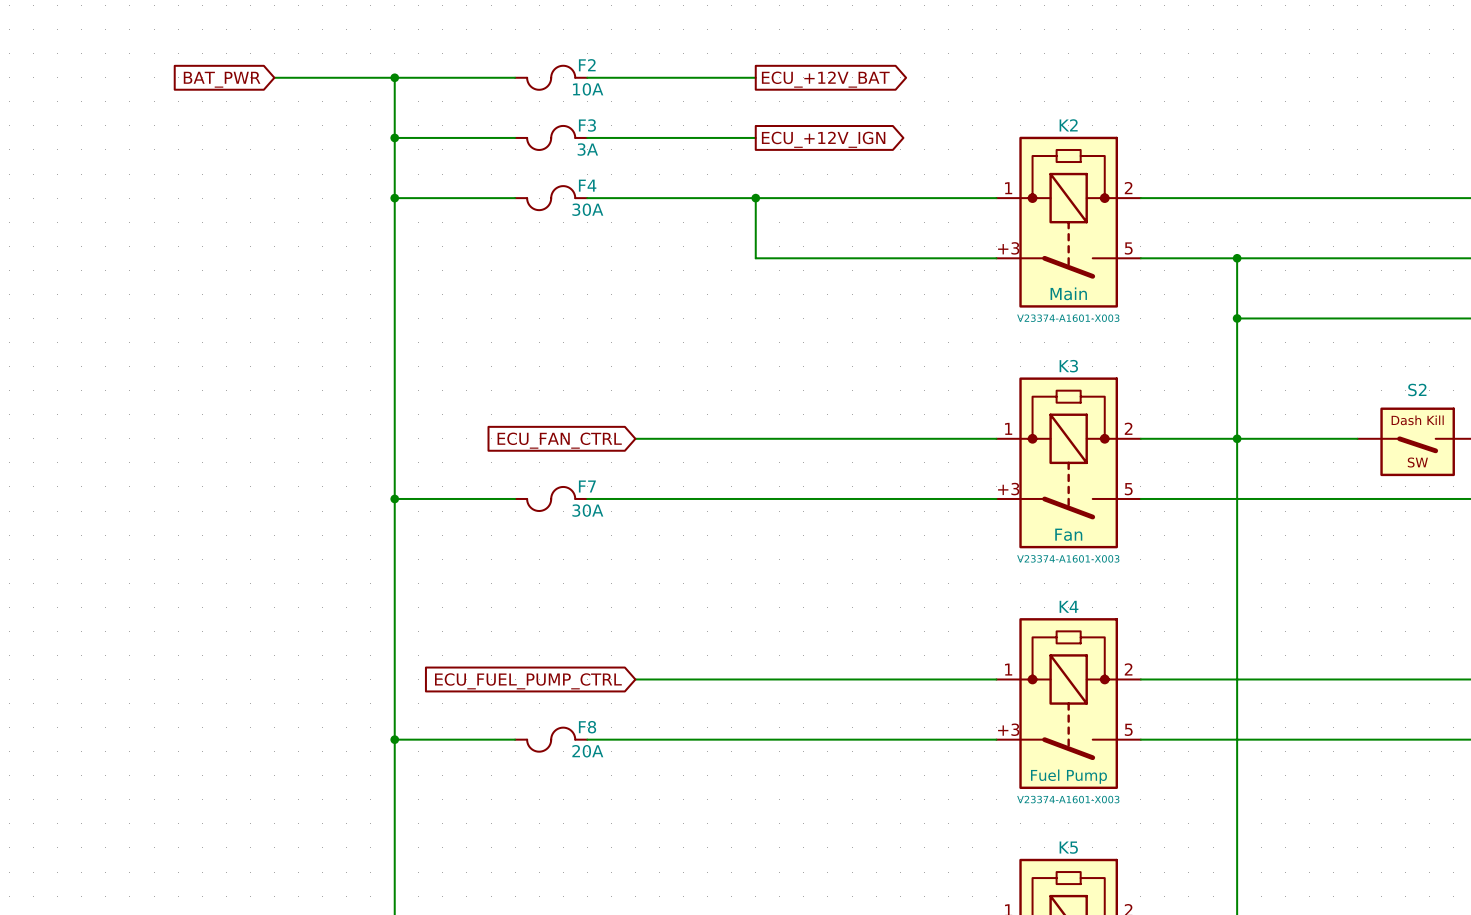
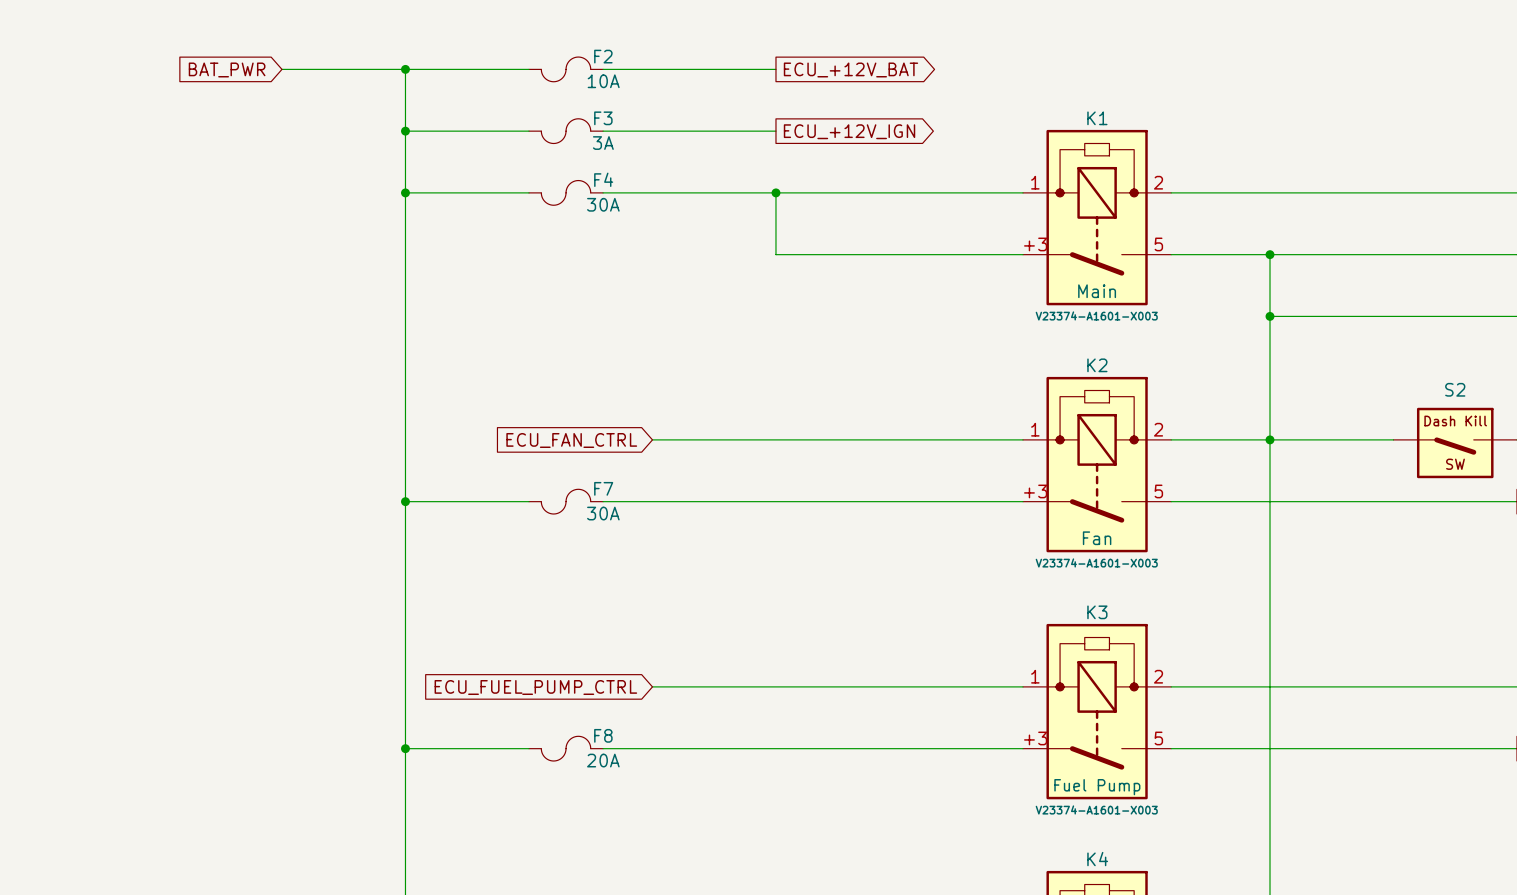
K2 name: K2 (1068, 125) -> K1 (1097, 118)
K3 name: K3 (1068, 366) -> K2 (1097, 365)
K4 name: K4 (1069, 606) -> K3 (1097, 612)
K5 name: K5 (1068, 847) -> K4 (1097, 859)

